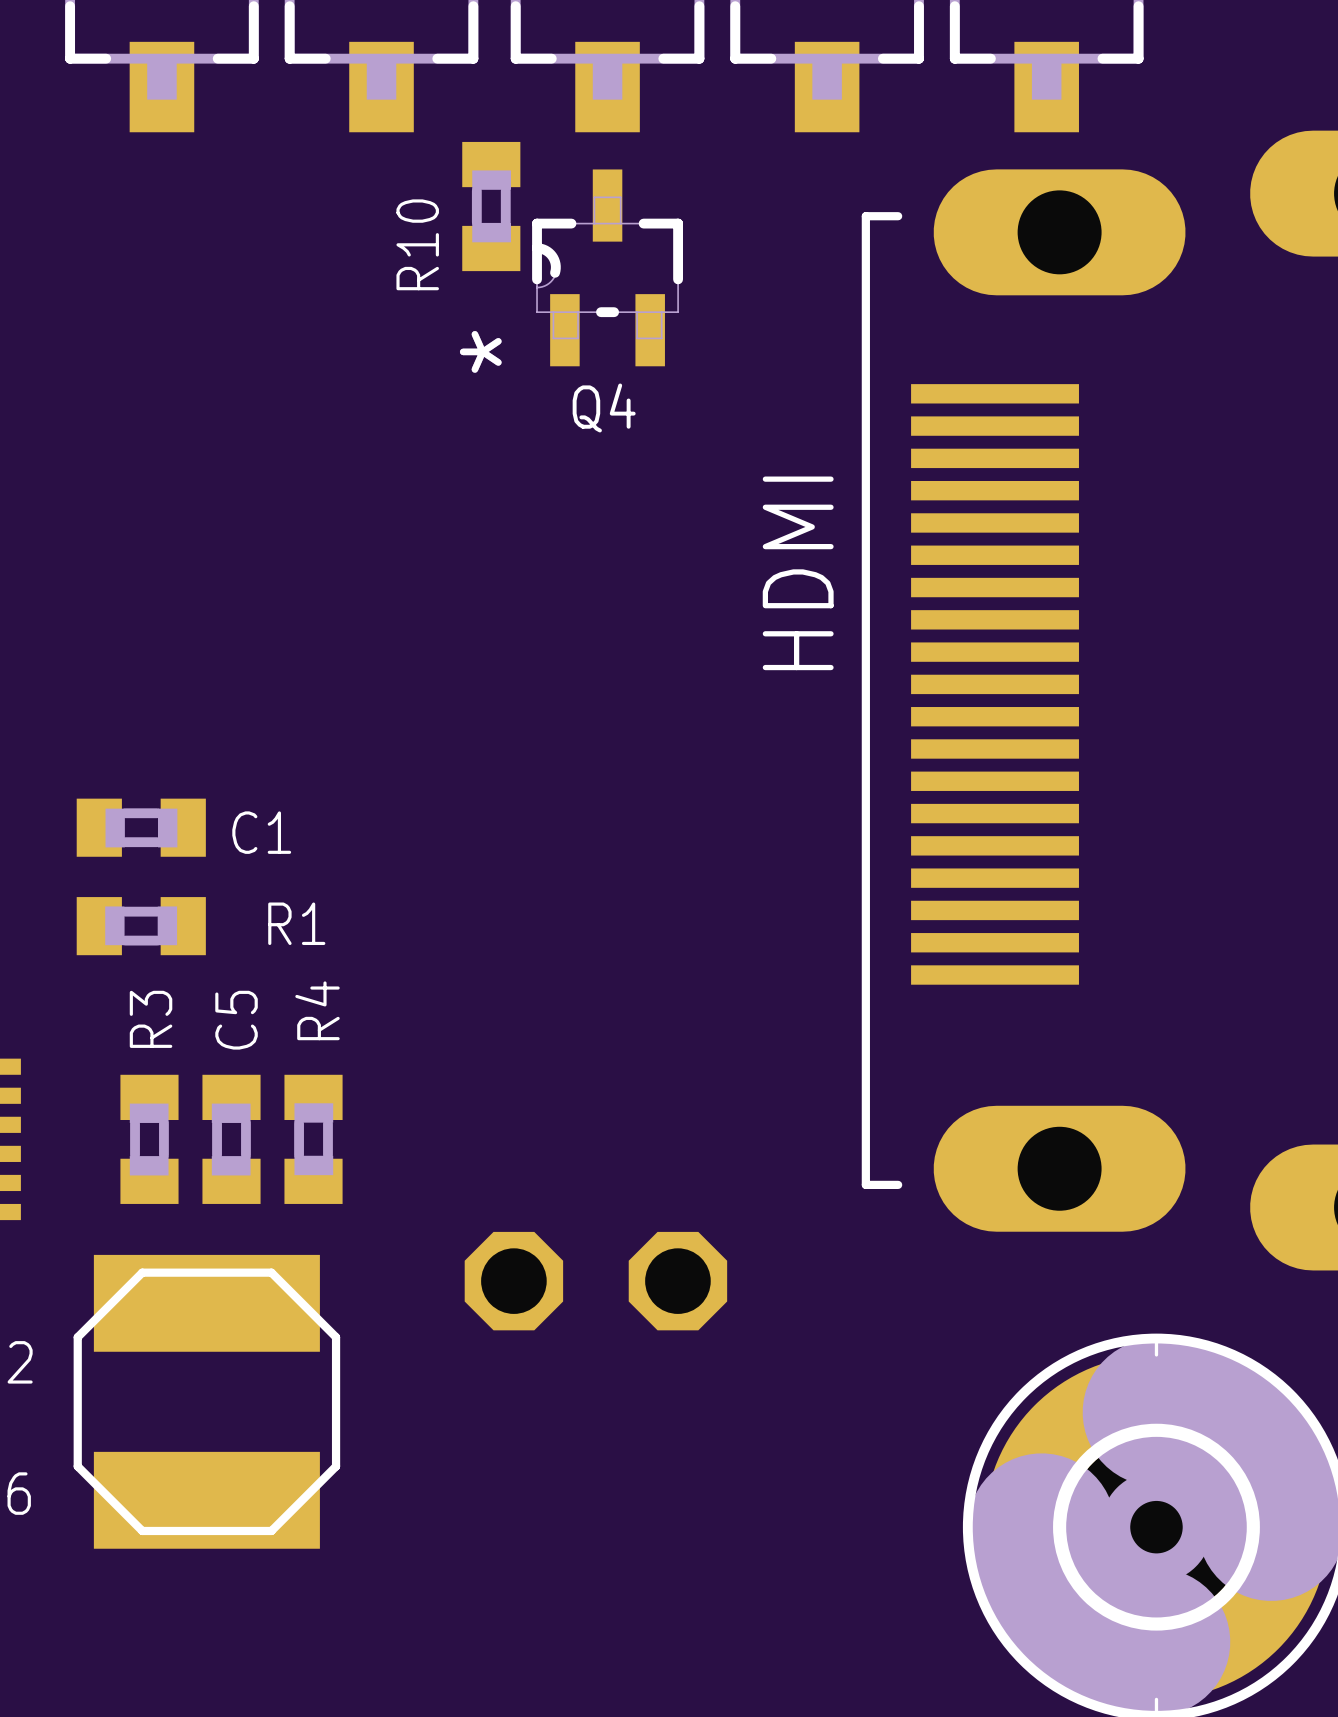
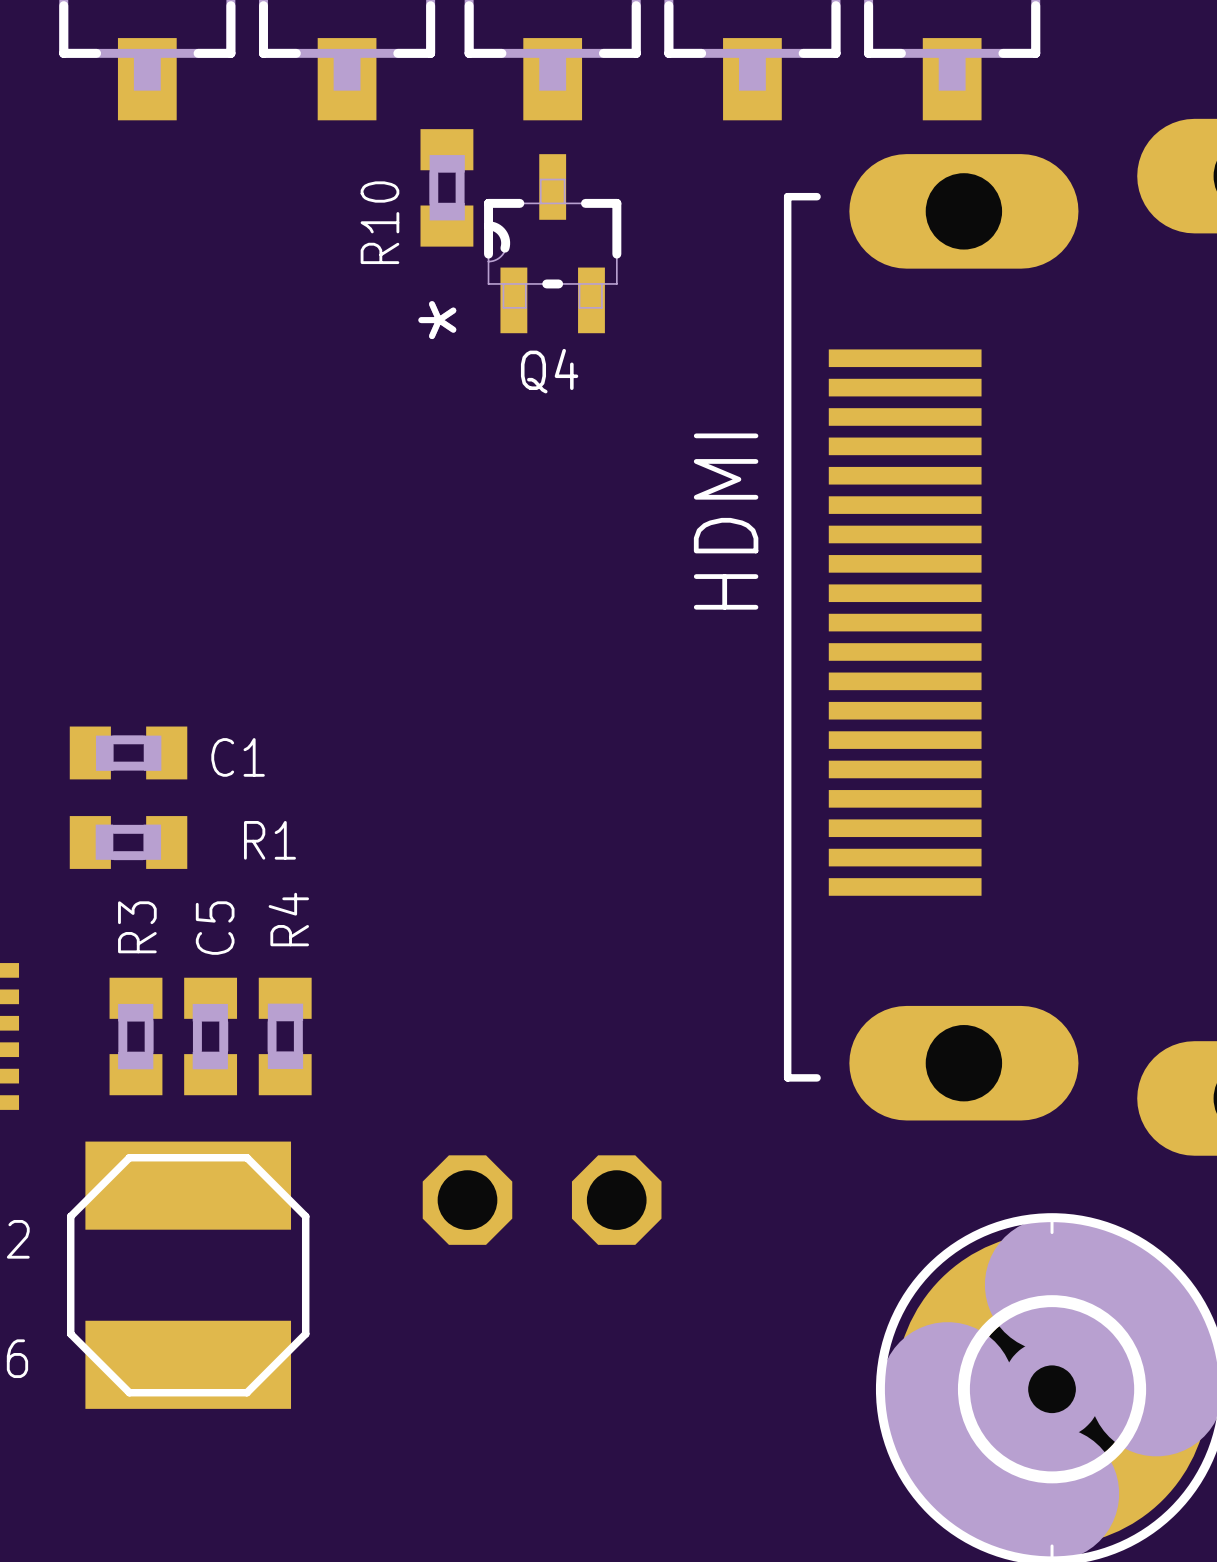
part position: (595, 1281) -> (542, 1200)

